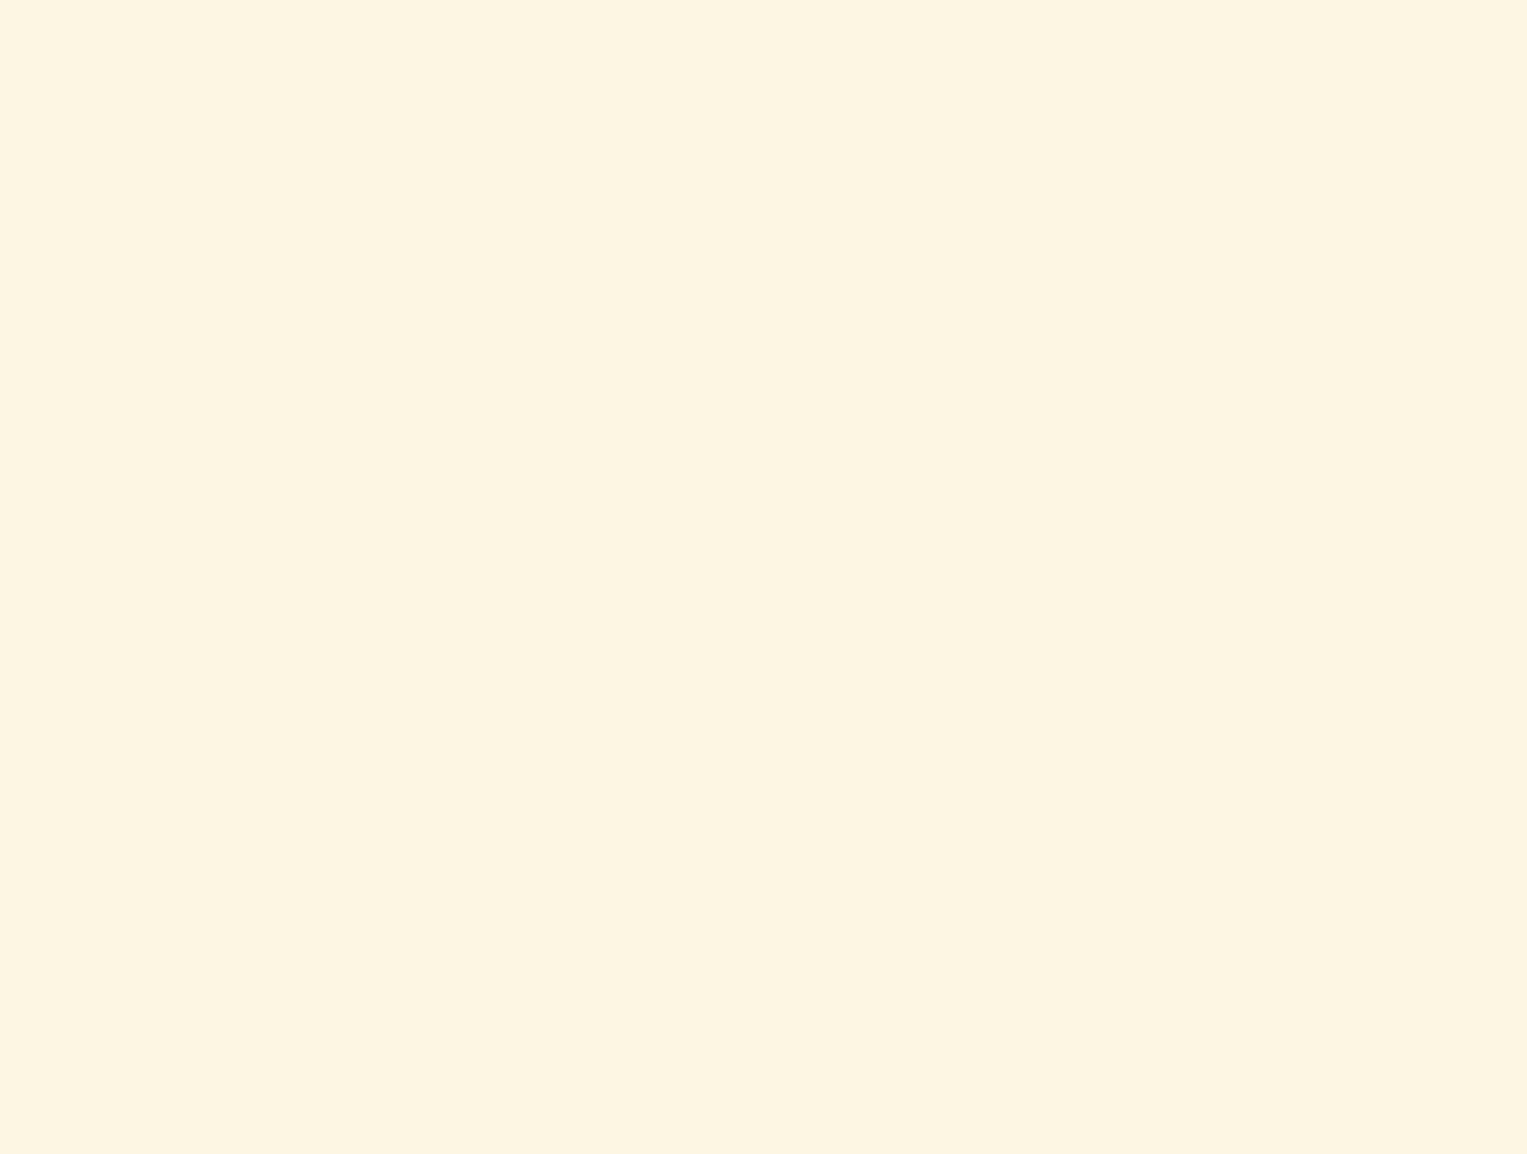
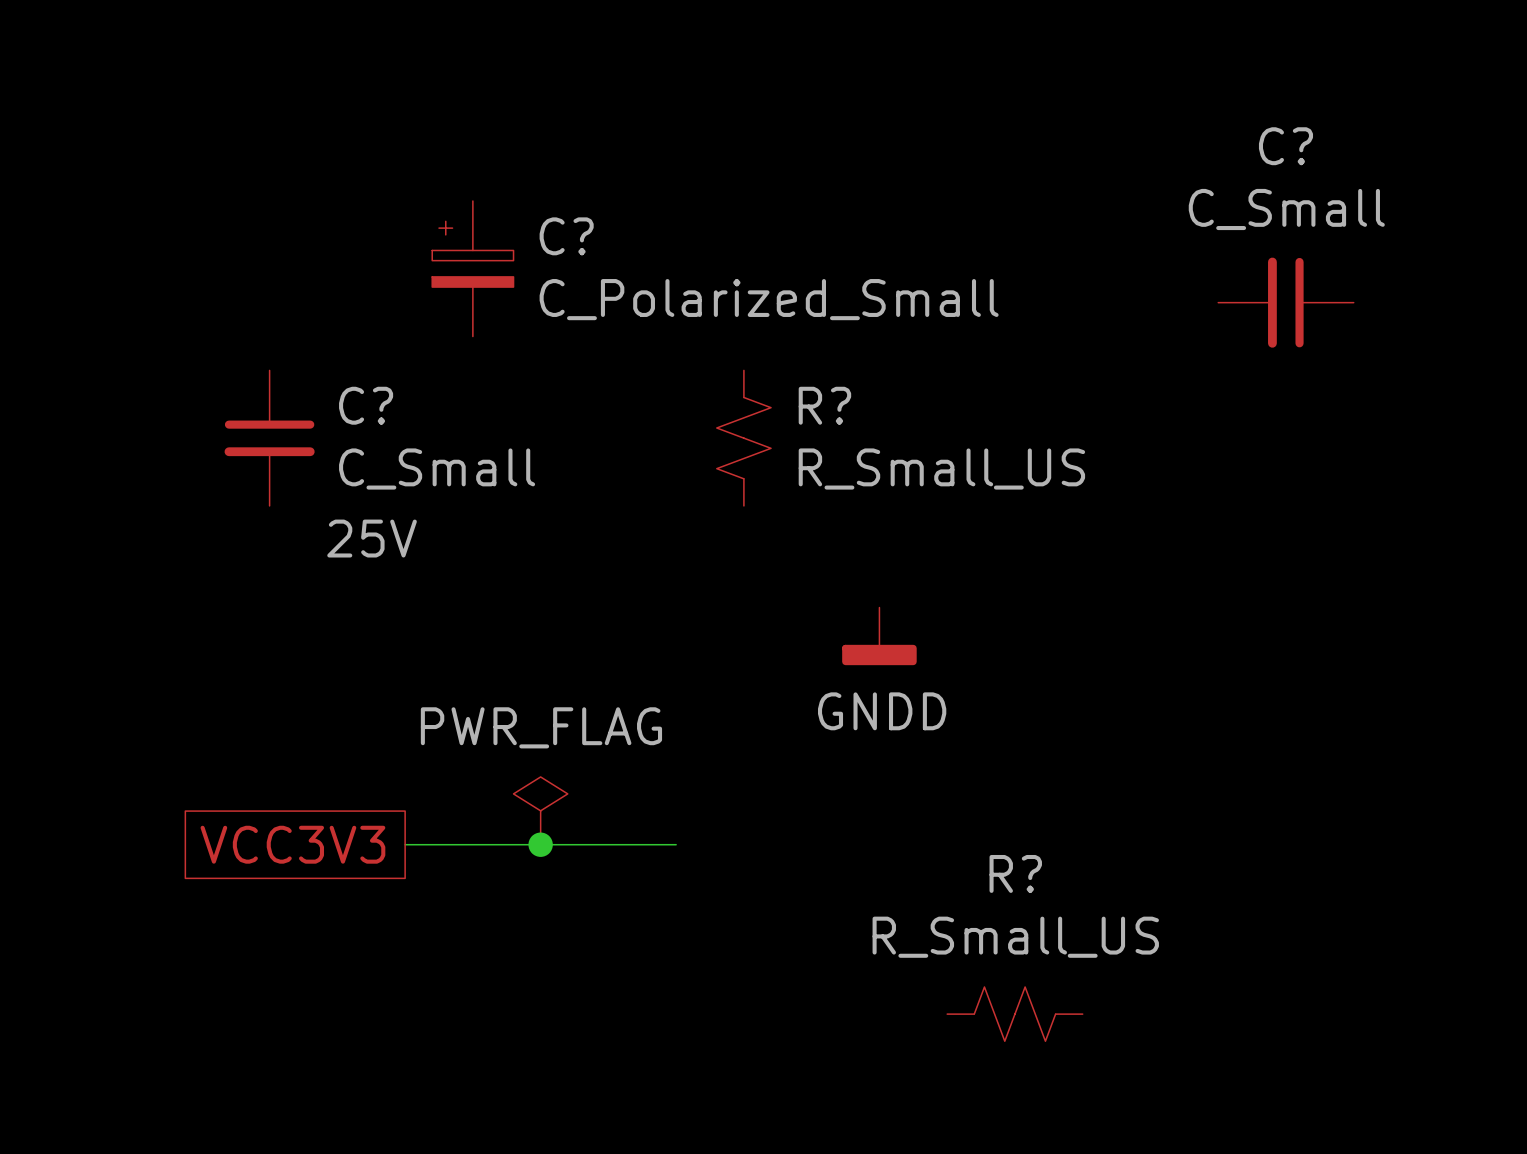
C?: none -> C_Polarized_Small (472, 268)
C?: none -> C_Small (1285, 302)
C?: none -> C_Small (269, 438)
R?: none -> R_Small_US (743, 438)
power symbol: none -> GNDD (879, 636)
power symbol: none -> PWR_FLAG (540, 810)
global label: none -> VCC3V3 (292, 844)
wire: none -> (405, 844) (676, 844)
junction: none -> (540, 844)
R?: none -> R_Small_US (1014, 1014)

